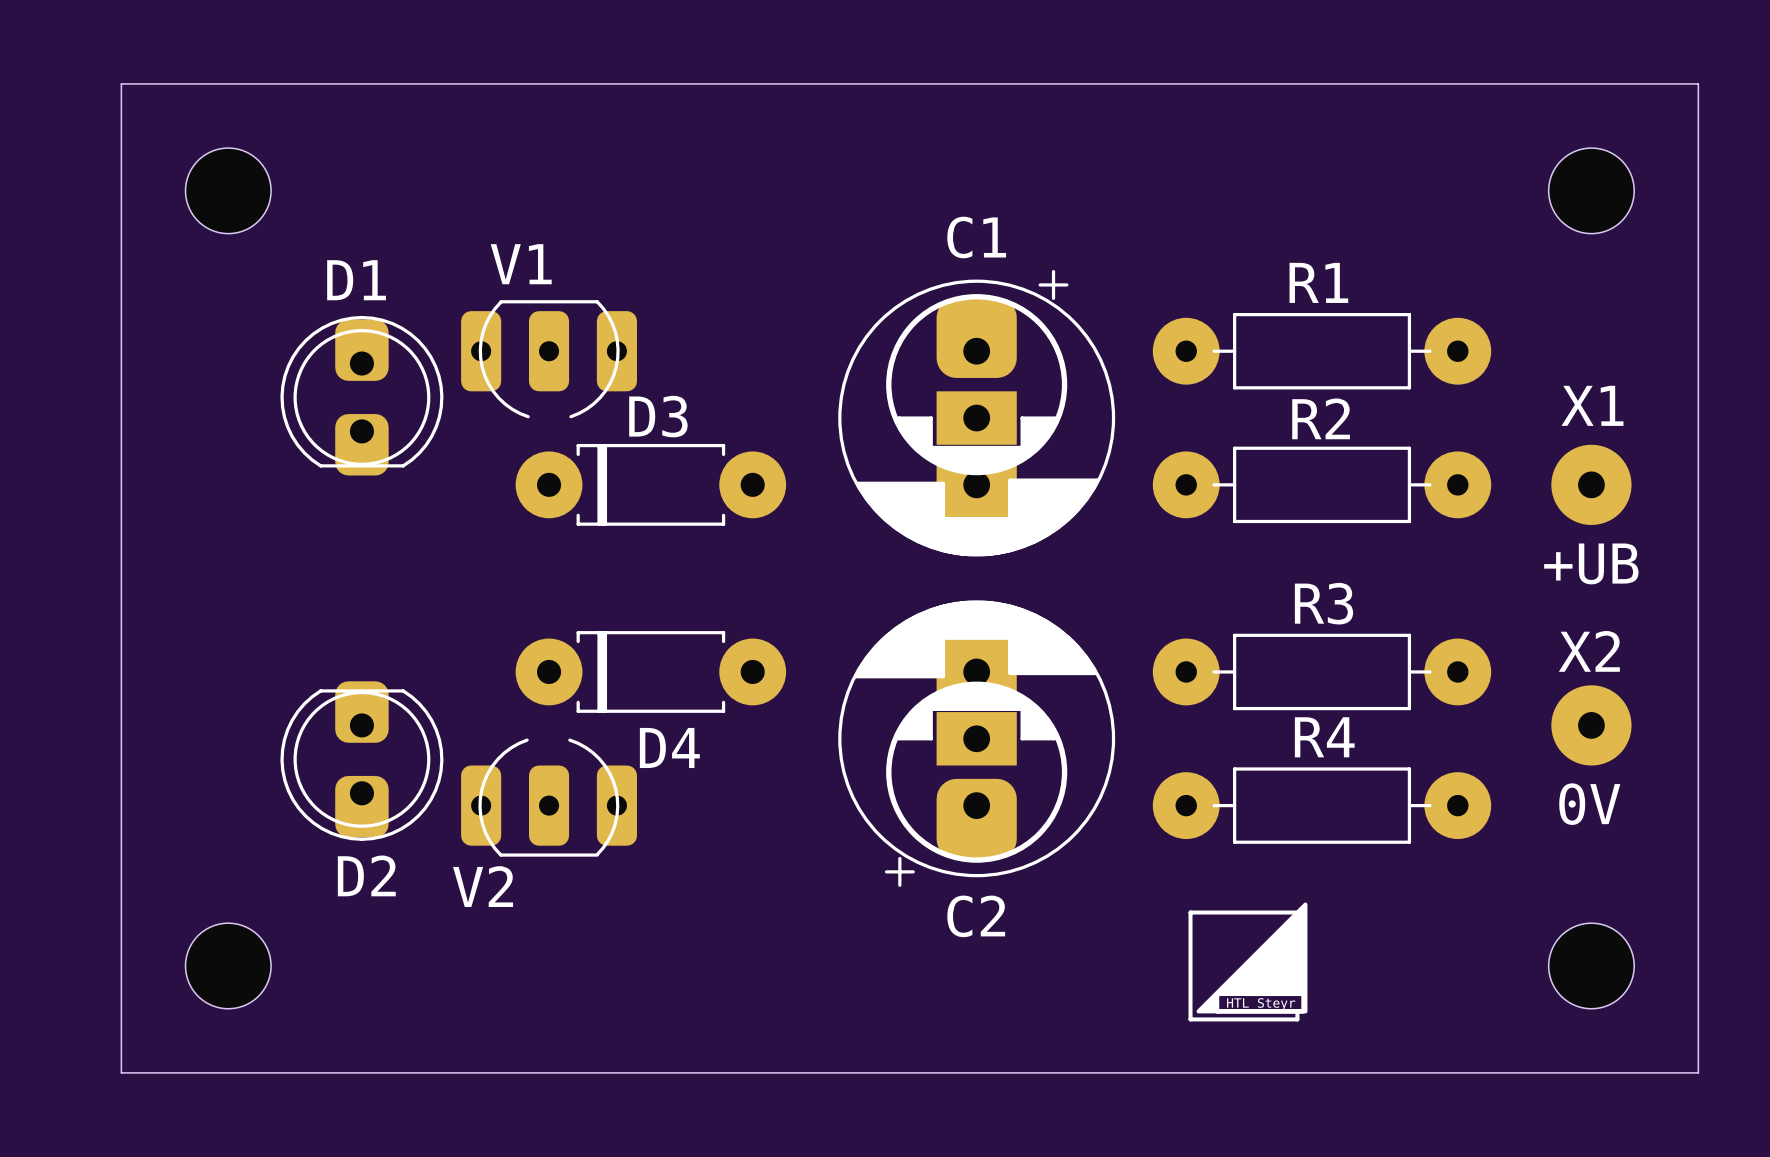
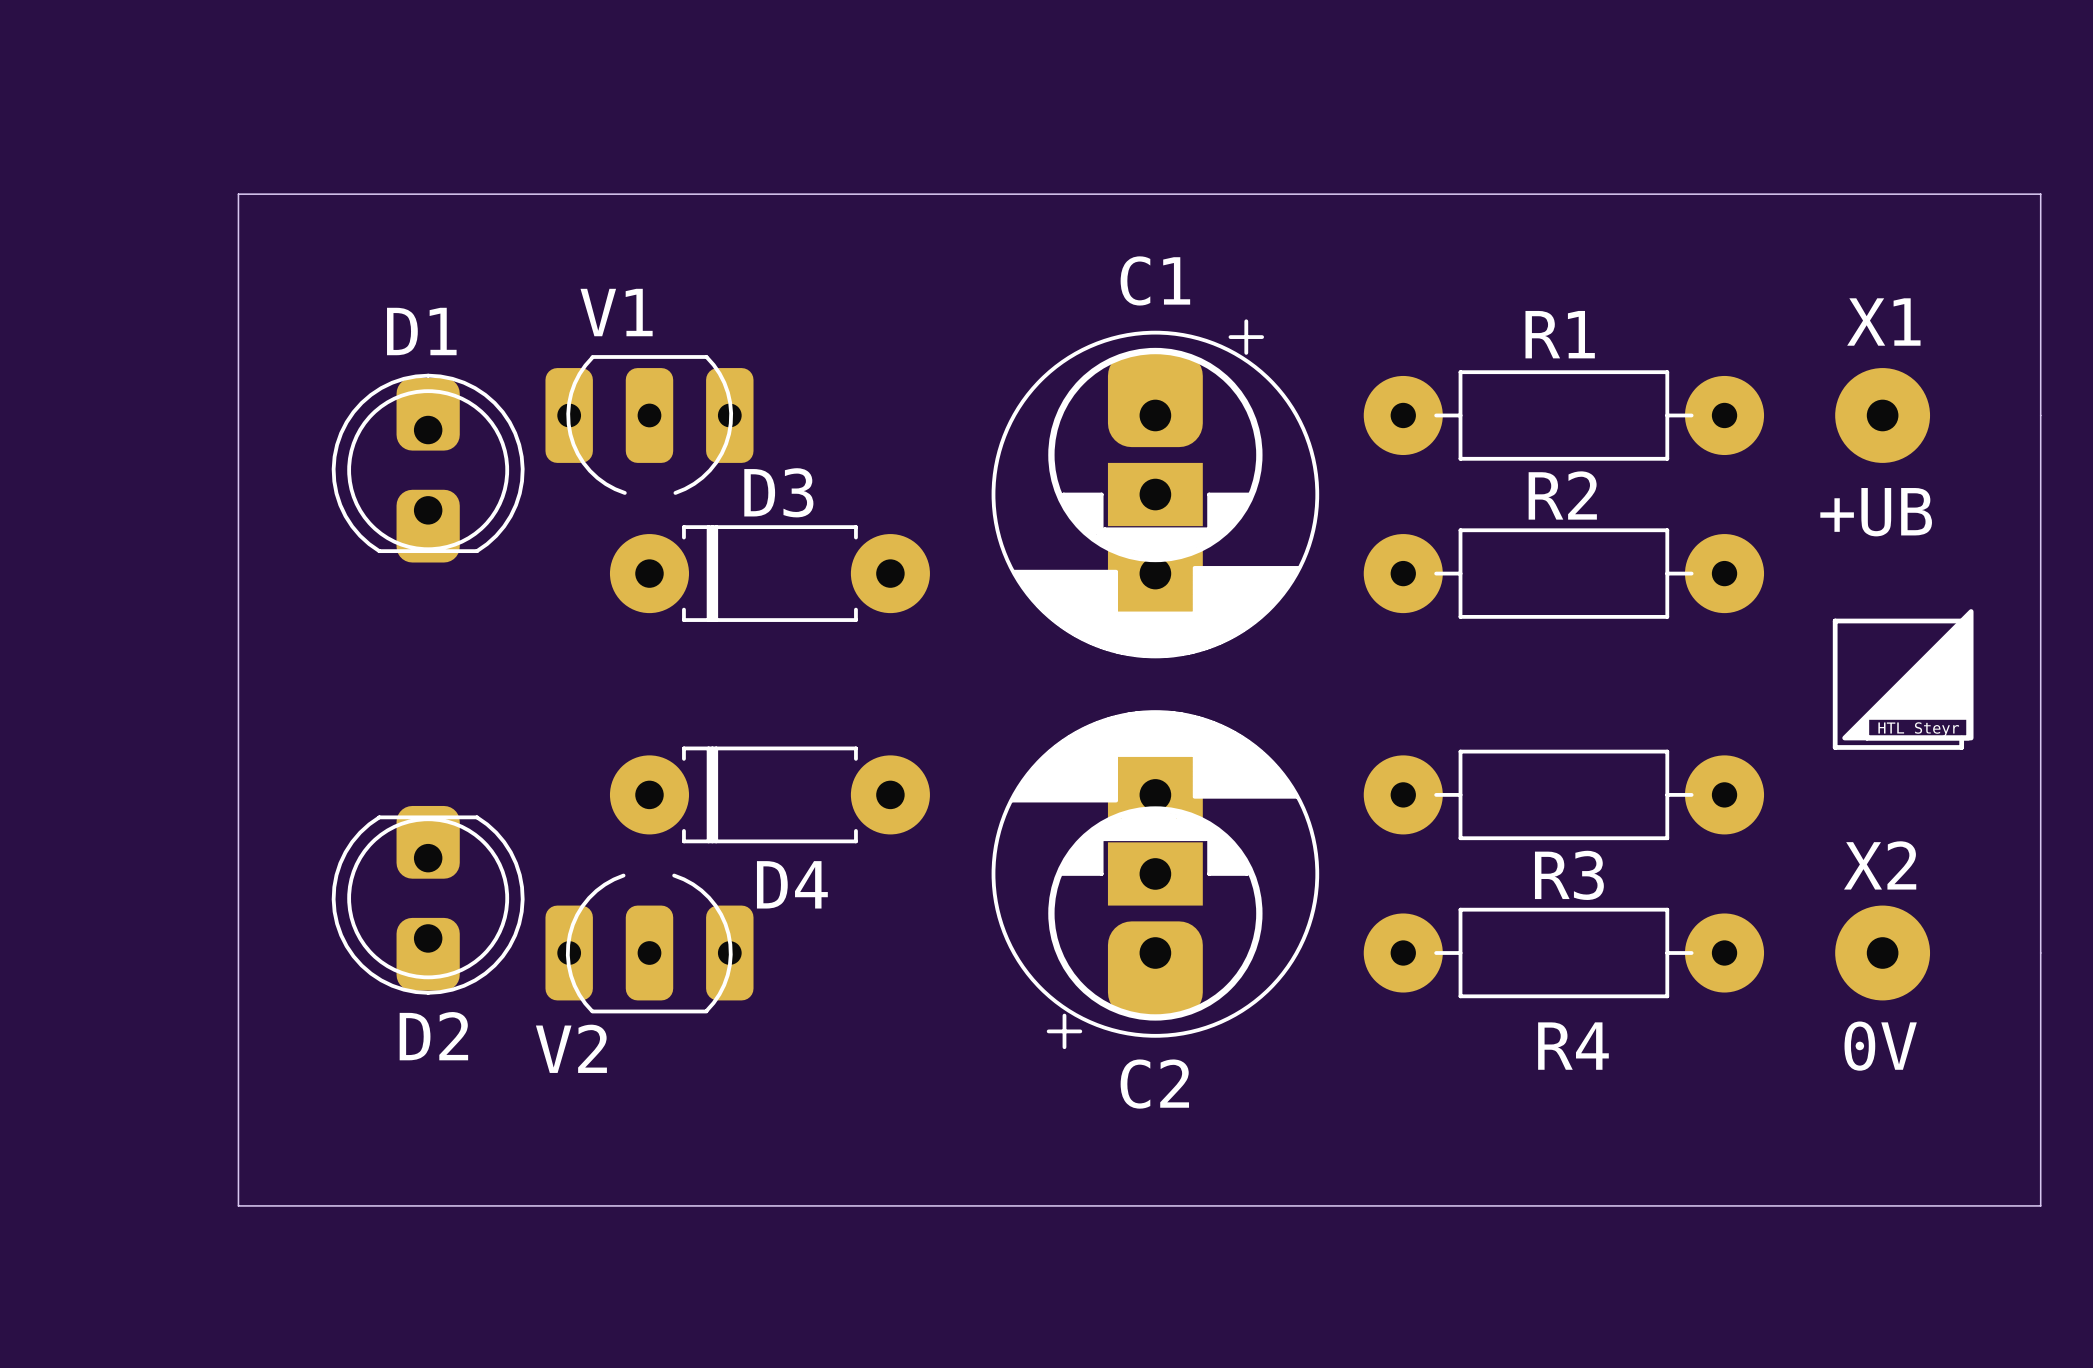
board edge: (121, 83) (1698, 83) (1698, 1072) (121, 1072) (121, 83) -> (238, 194) (238, 1205) (2040, 1205) (2040, 194) (238, 194)
part: (228, 190) -> none
part: (1591, 190) -> none
X1 position: (1591, 484) -> (1882, 415)
X1 value position: +UB (1591, 563) -> +UB (1876, 512)
R3 name position: R3 (1324, 603) -> R3 (1569, 875)
X2 position: (1591, 725) -> (1882, 953)
R4 name position: R4 (1324, 737) -> R4 (1573, 1046)
drawing position: (1247, 961) -> (1903, 679)
part: (228, 965) -> none
part: (1591, 965) -> none

